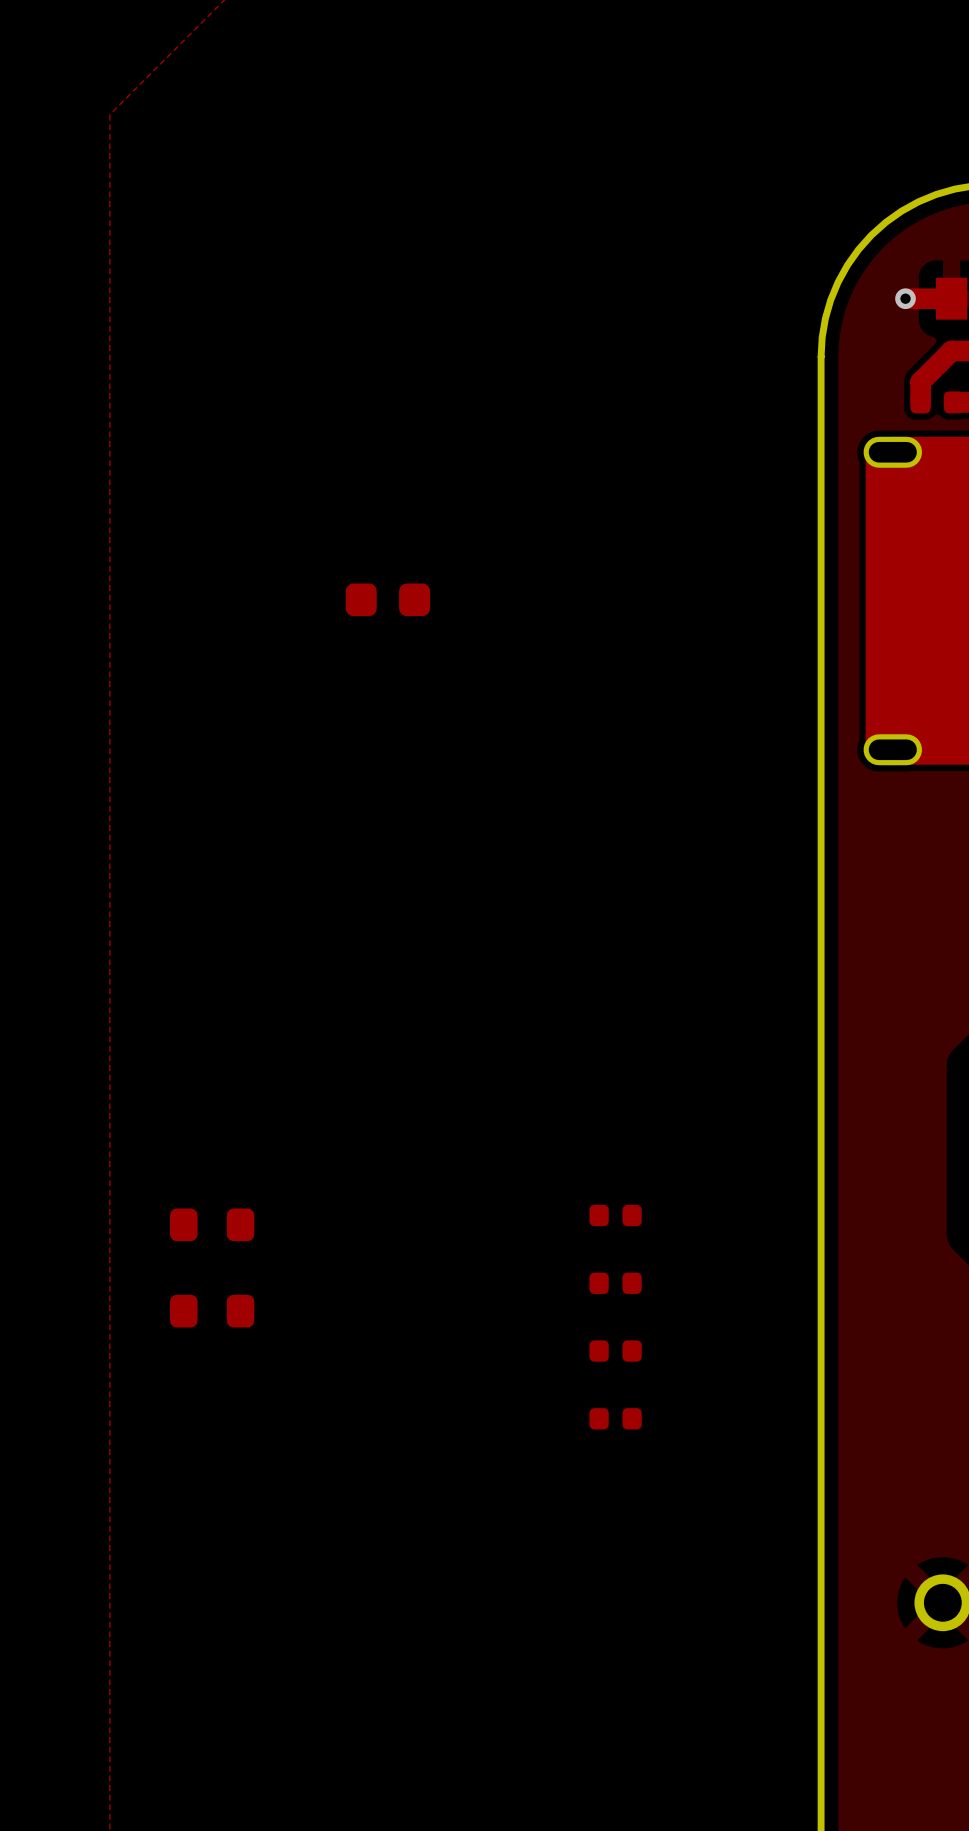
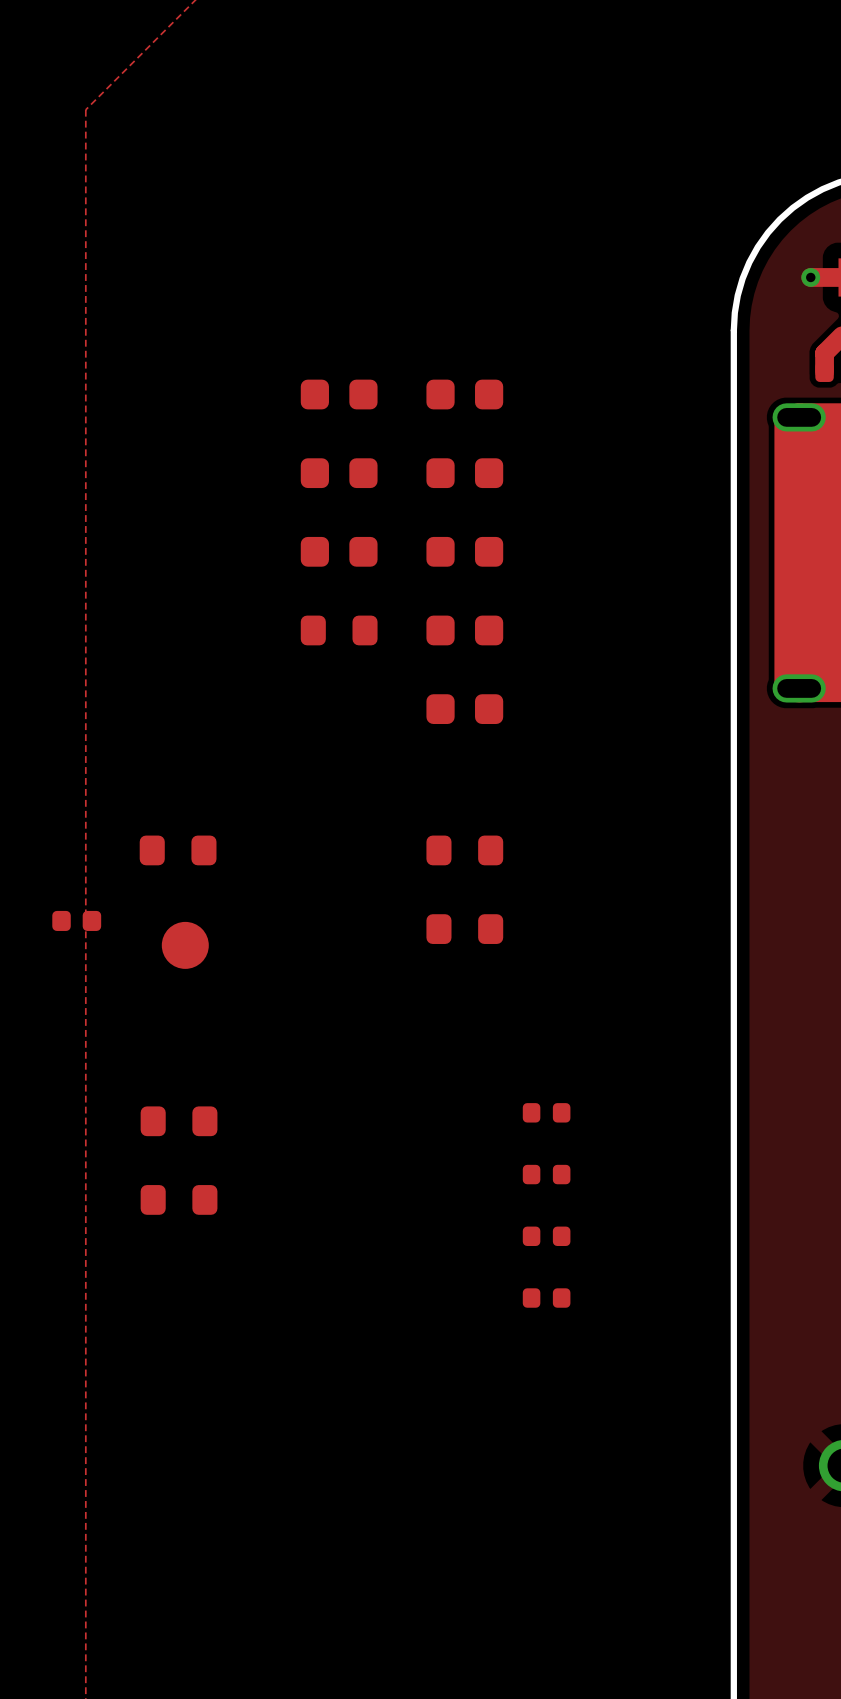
part: none -> (339, 394)
part: none -> (464, 394)
part: none -> (339, 473)
part: none -> (464, 473)
part: none -> (464, 551)
part: none -> (339, 630)
part: none -> (464, 630)
part: none -> (464, 709)
part: none -> (178, 850)
part: none -> (464, 850)
part: none -> (76, 920)
part: none -> (464, 929)
part: none -> (185, 945)

